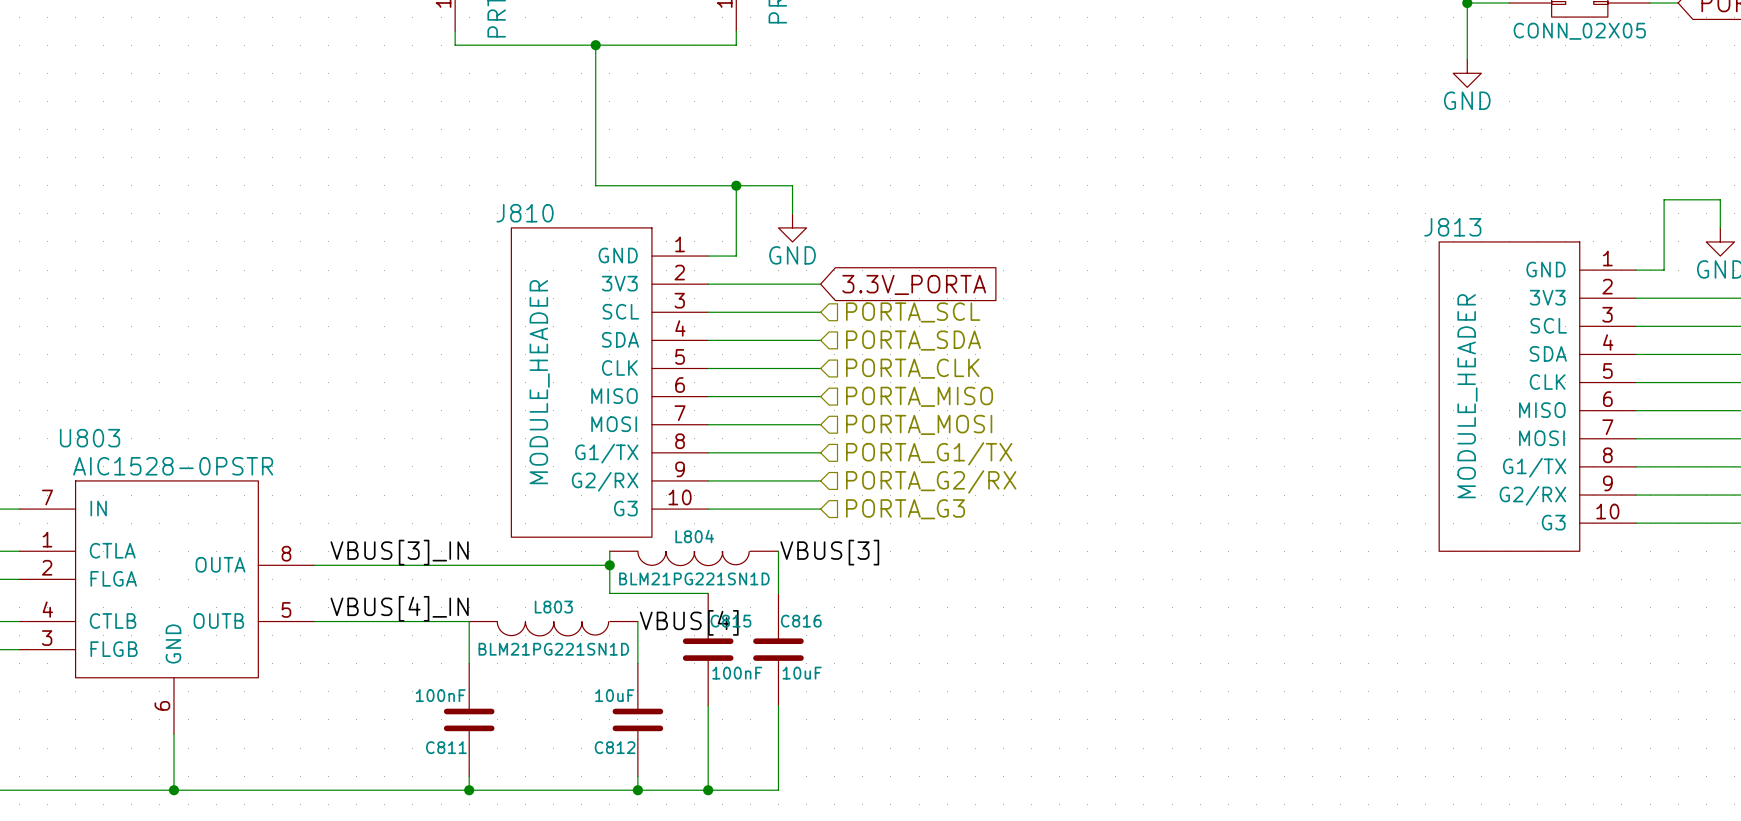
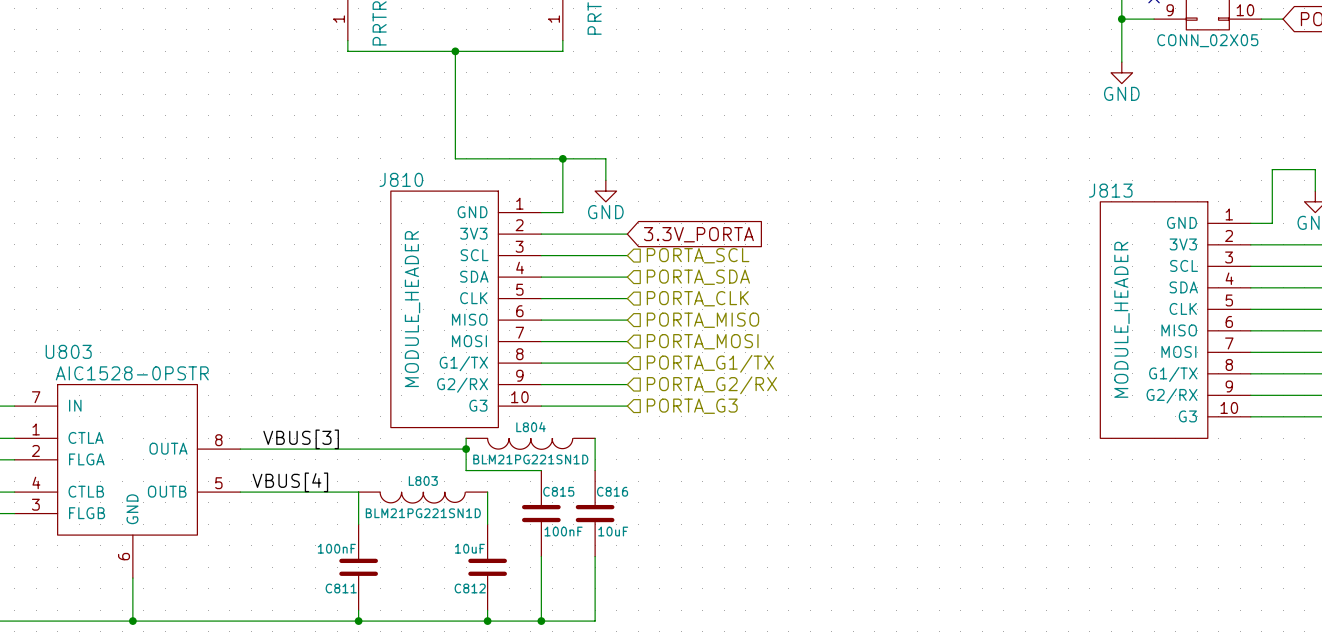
label: VBUS[3]_IN (399, 552) -> VBUS[3] (301, 439)
label: VBUS[3] (829, 552) -> none
label: VBUS[4]_IN (399, 608) -> VBUS[4] (290, 482)
label: VBUS[4] (689, 622) -> none

